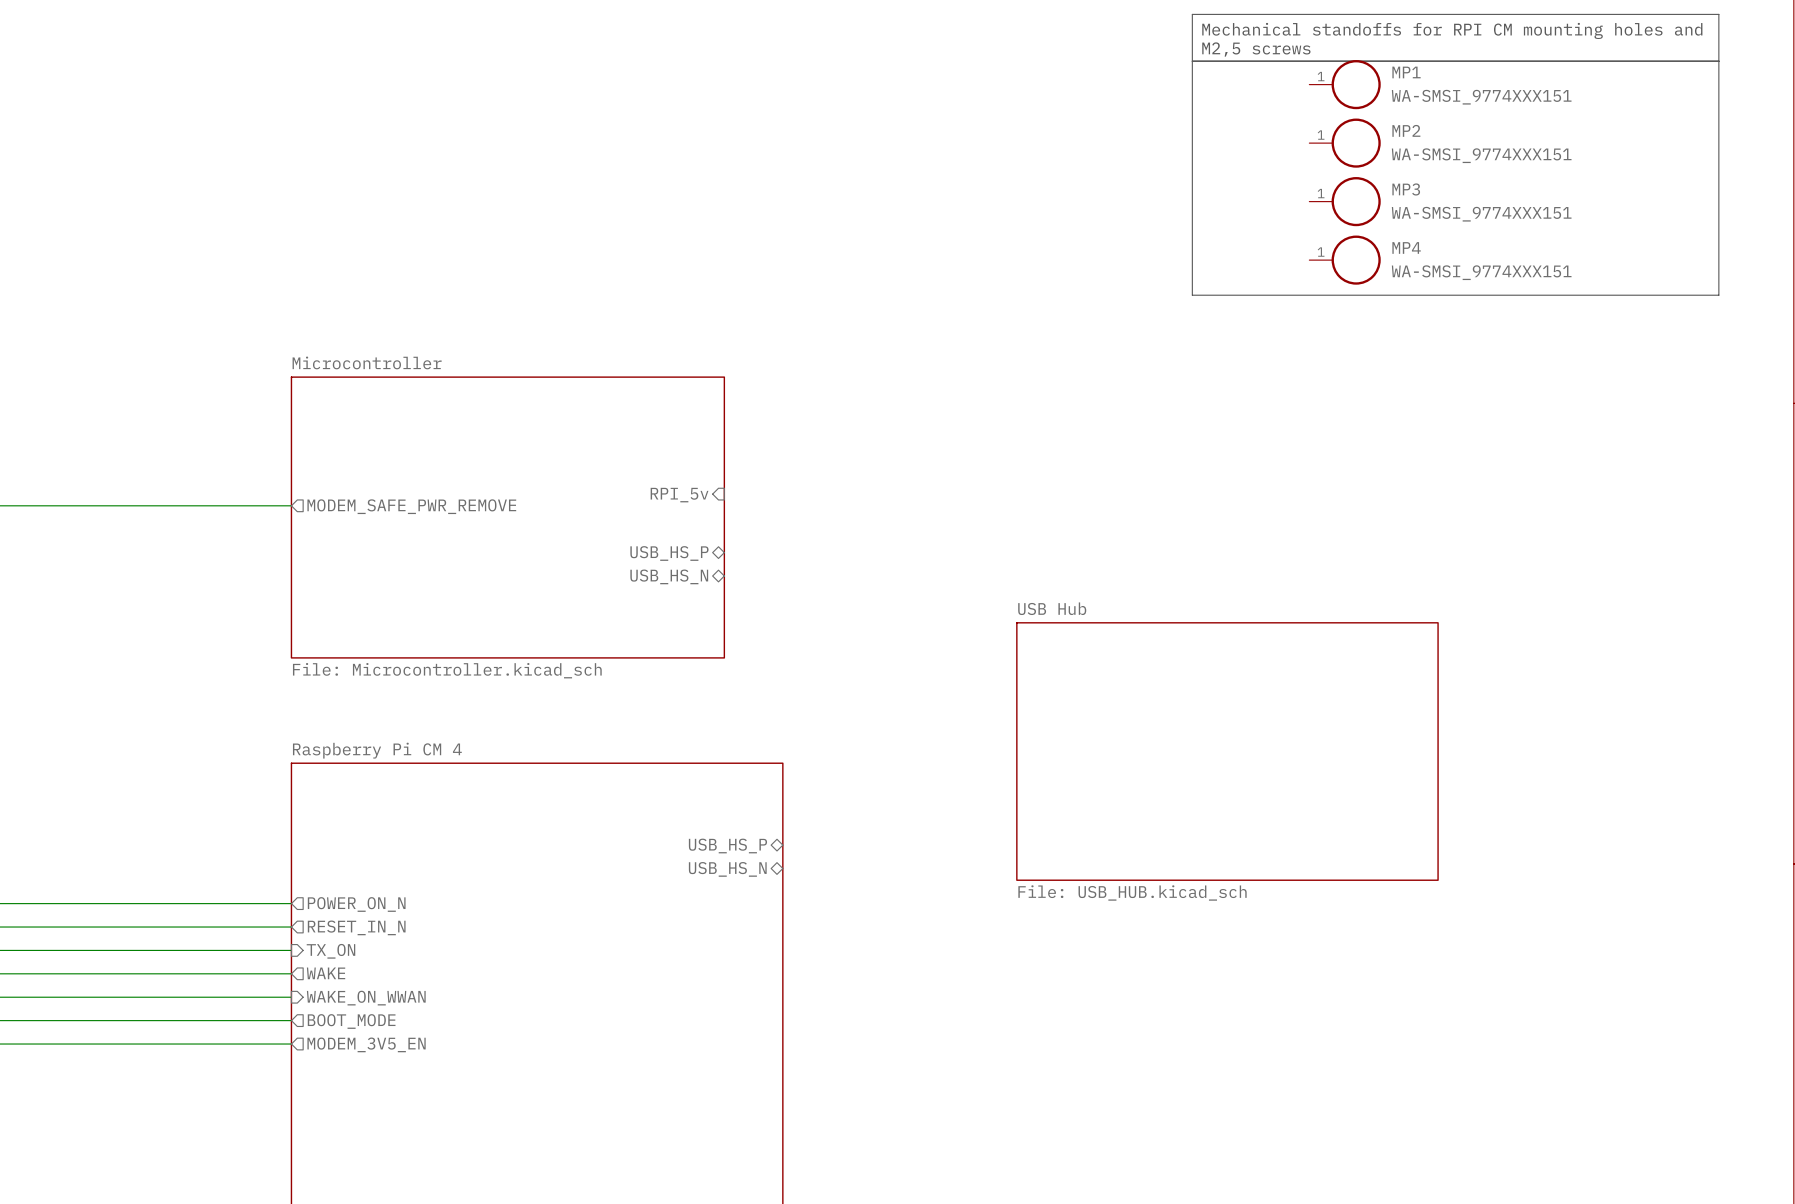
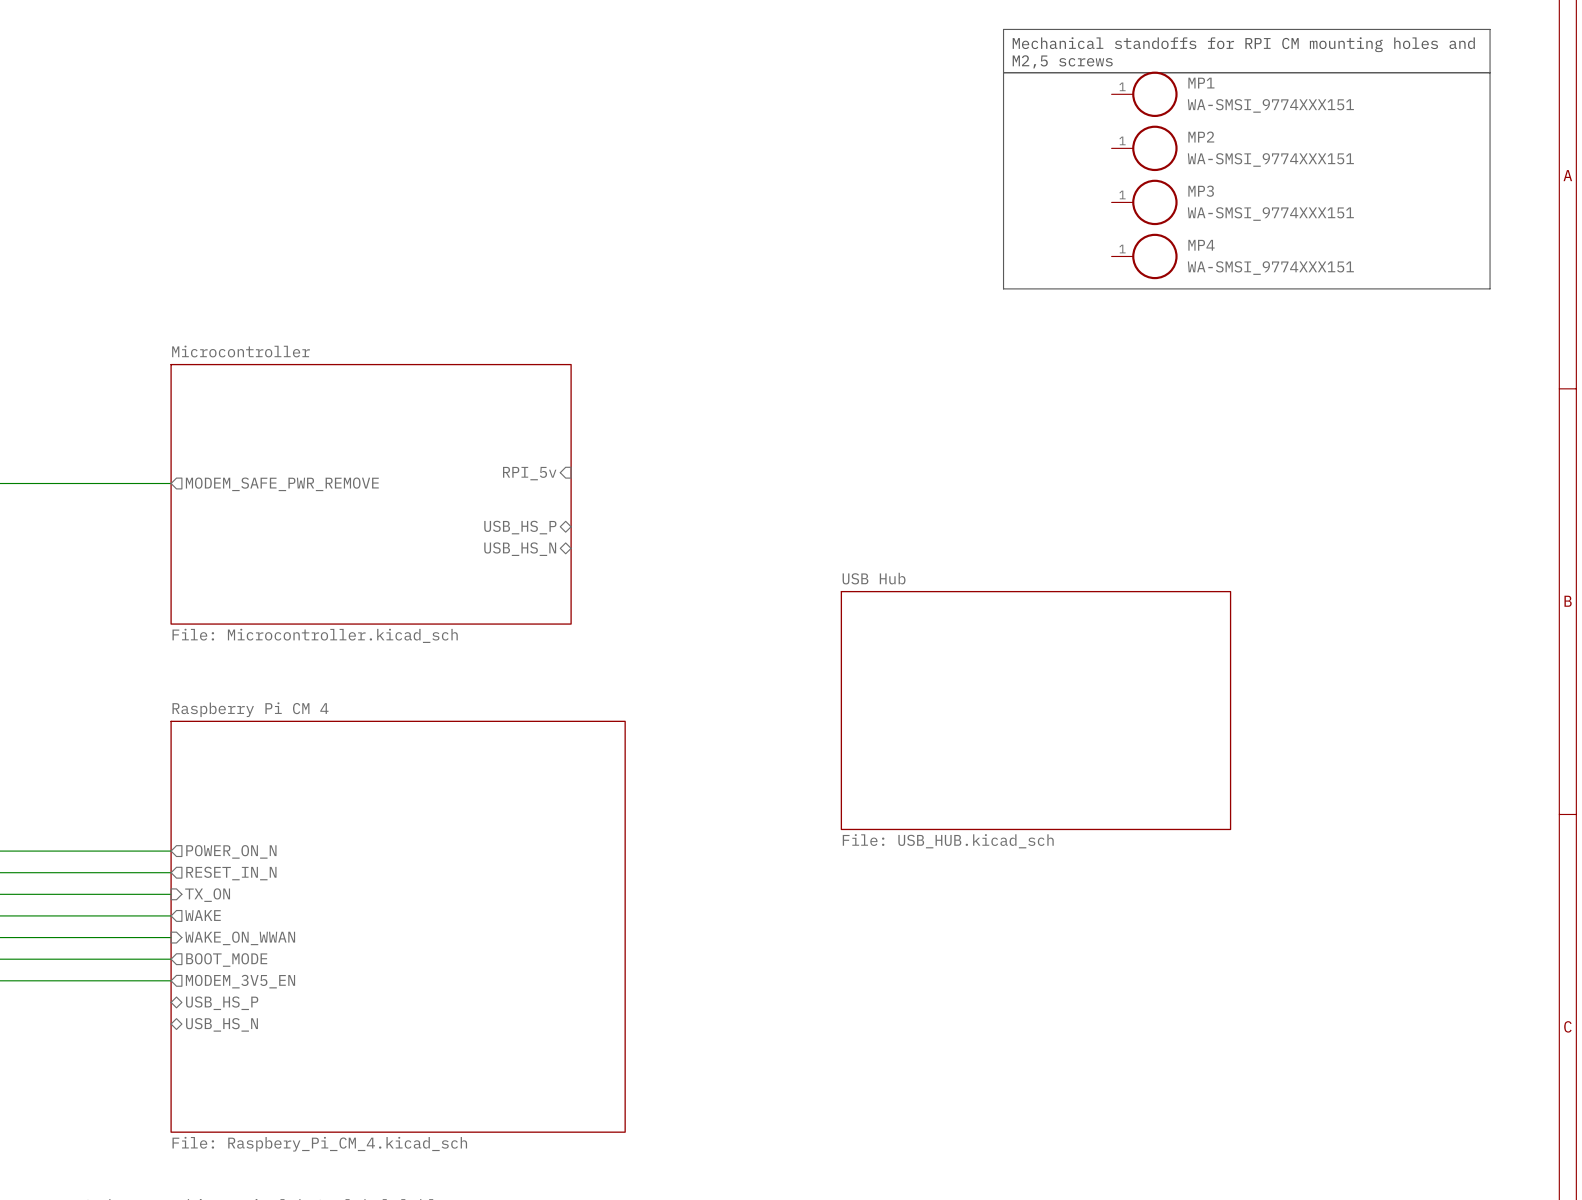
sheet pin: USB_HS_P (727, 845) -> none
sheet pin: USB_HS_N (727, 869) -> none
sheet pin: none -> USB_HS_P (222, 1003)
sheet pin: none -> USB_HS_N (221, 1024)

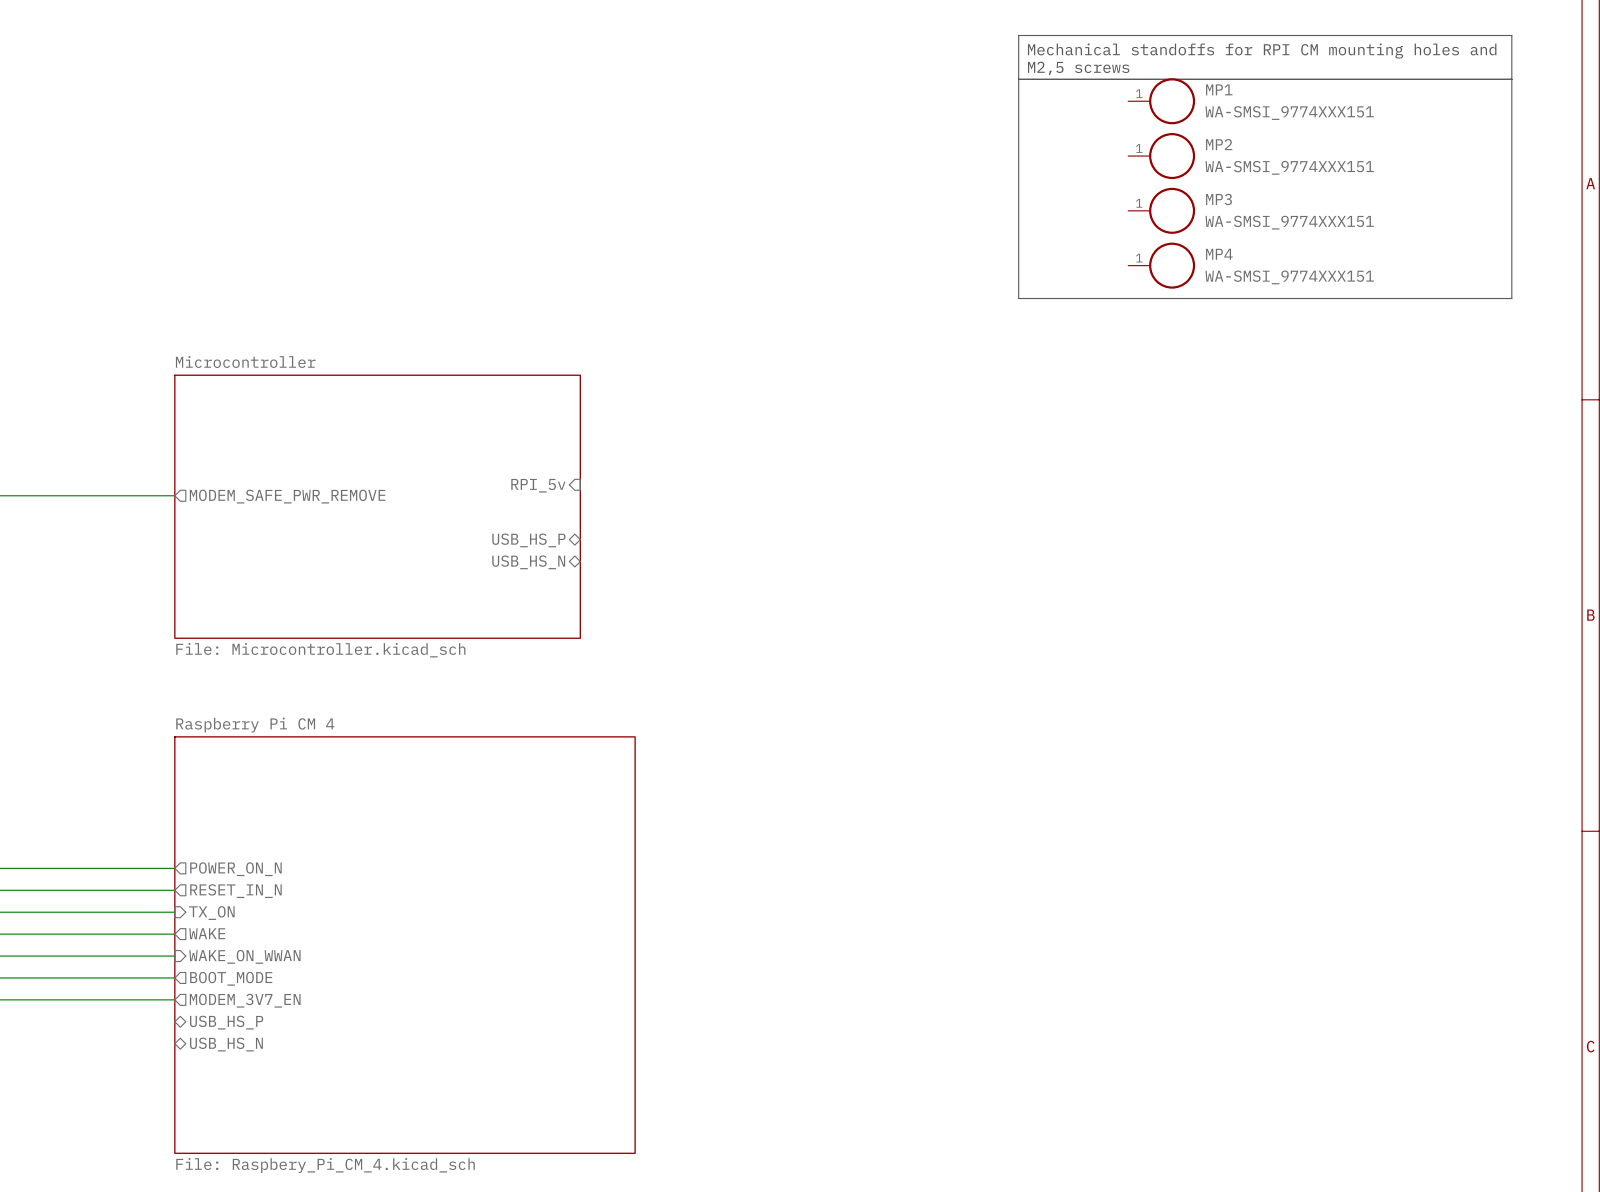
sheet USB Hub: File: USB_HUB.kicad_sch (1035, 710) -> none
sheet pin: MODEM_3V5_EN (240, 981) -> MODEM_3V7_EN (245, 1000)

